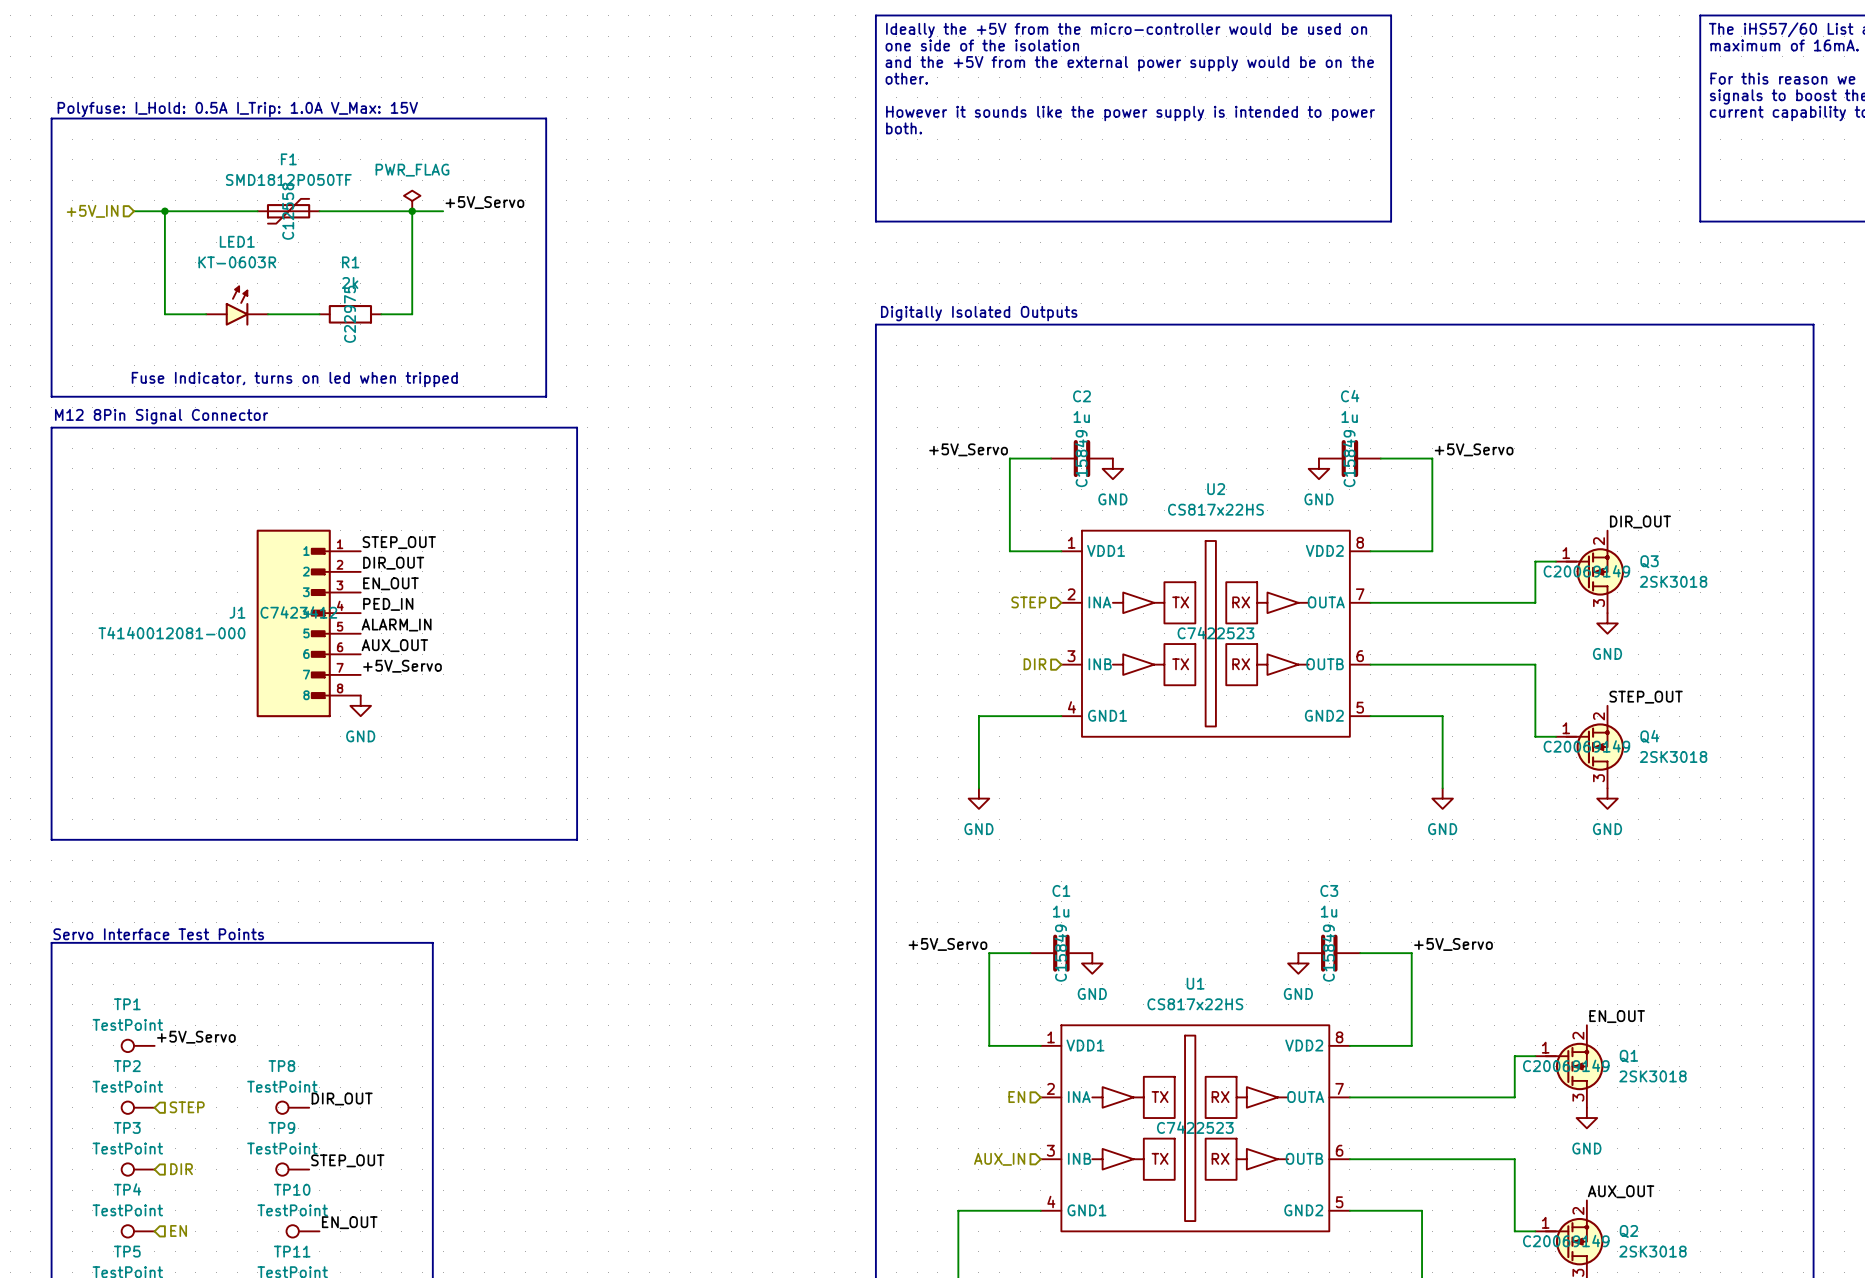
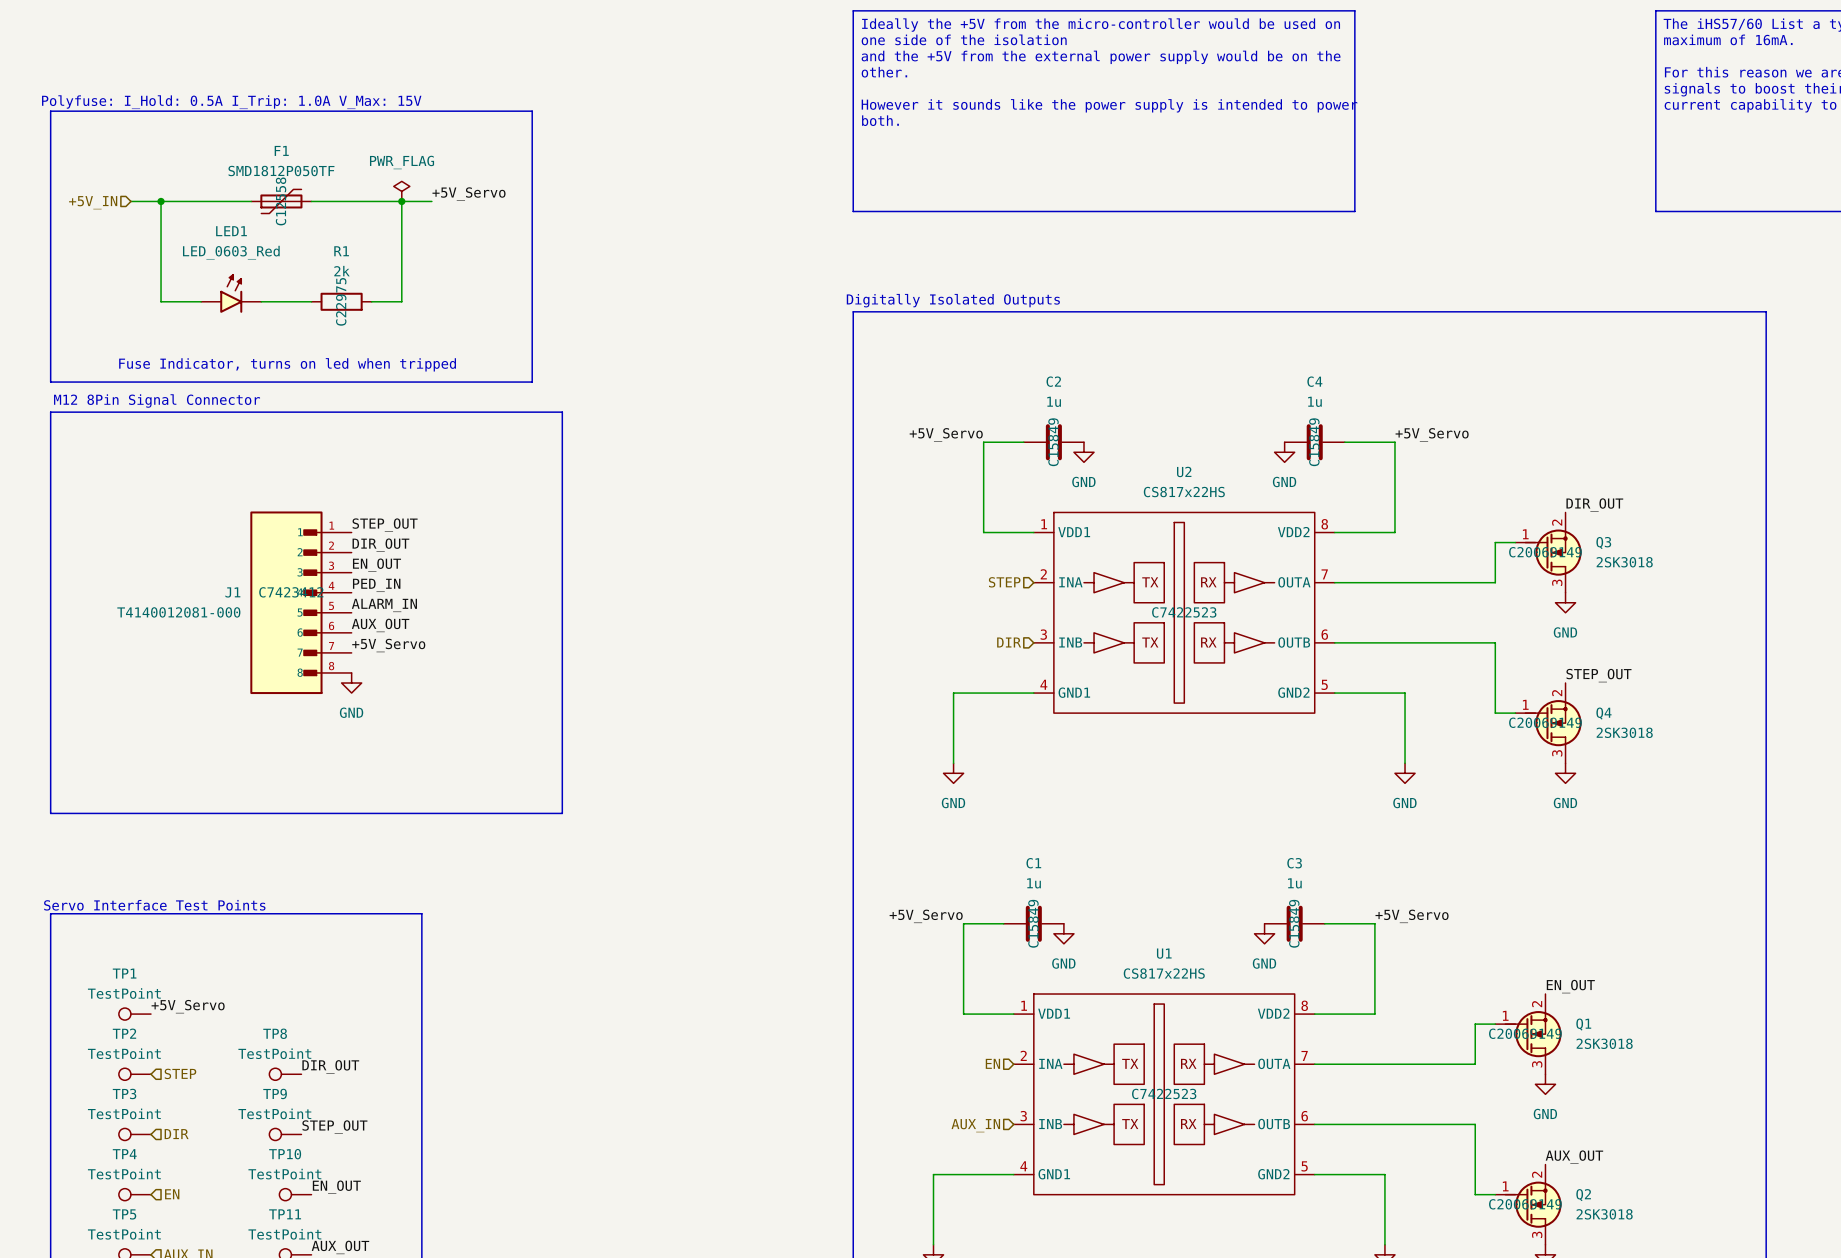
LED1 value: KT-0603R (237, 262) -> LED_0603_Red (231, 252)

